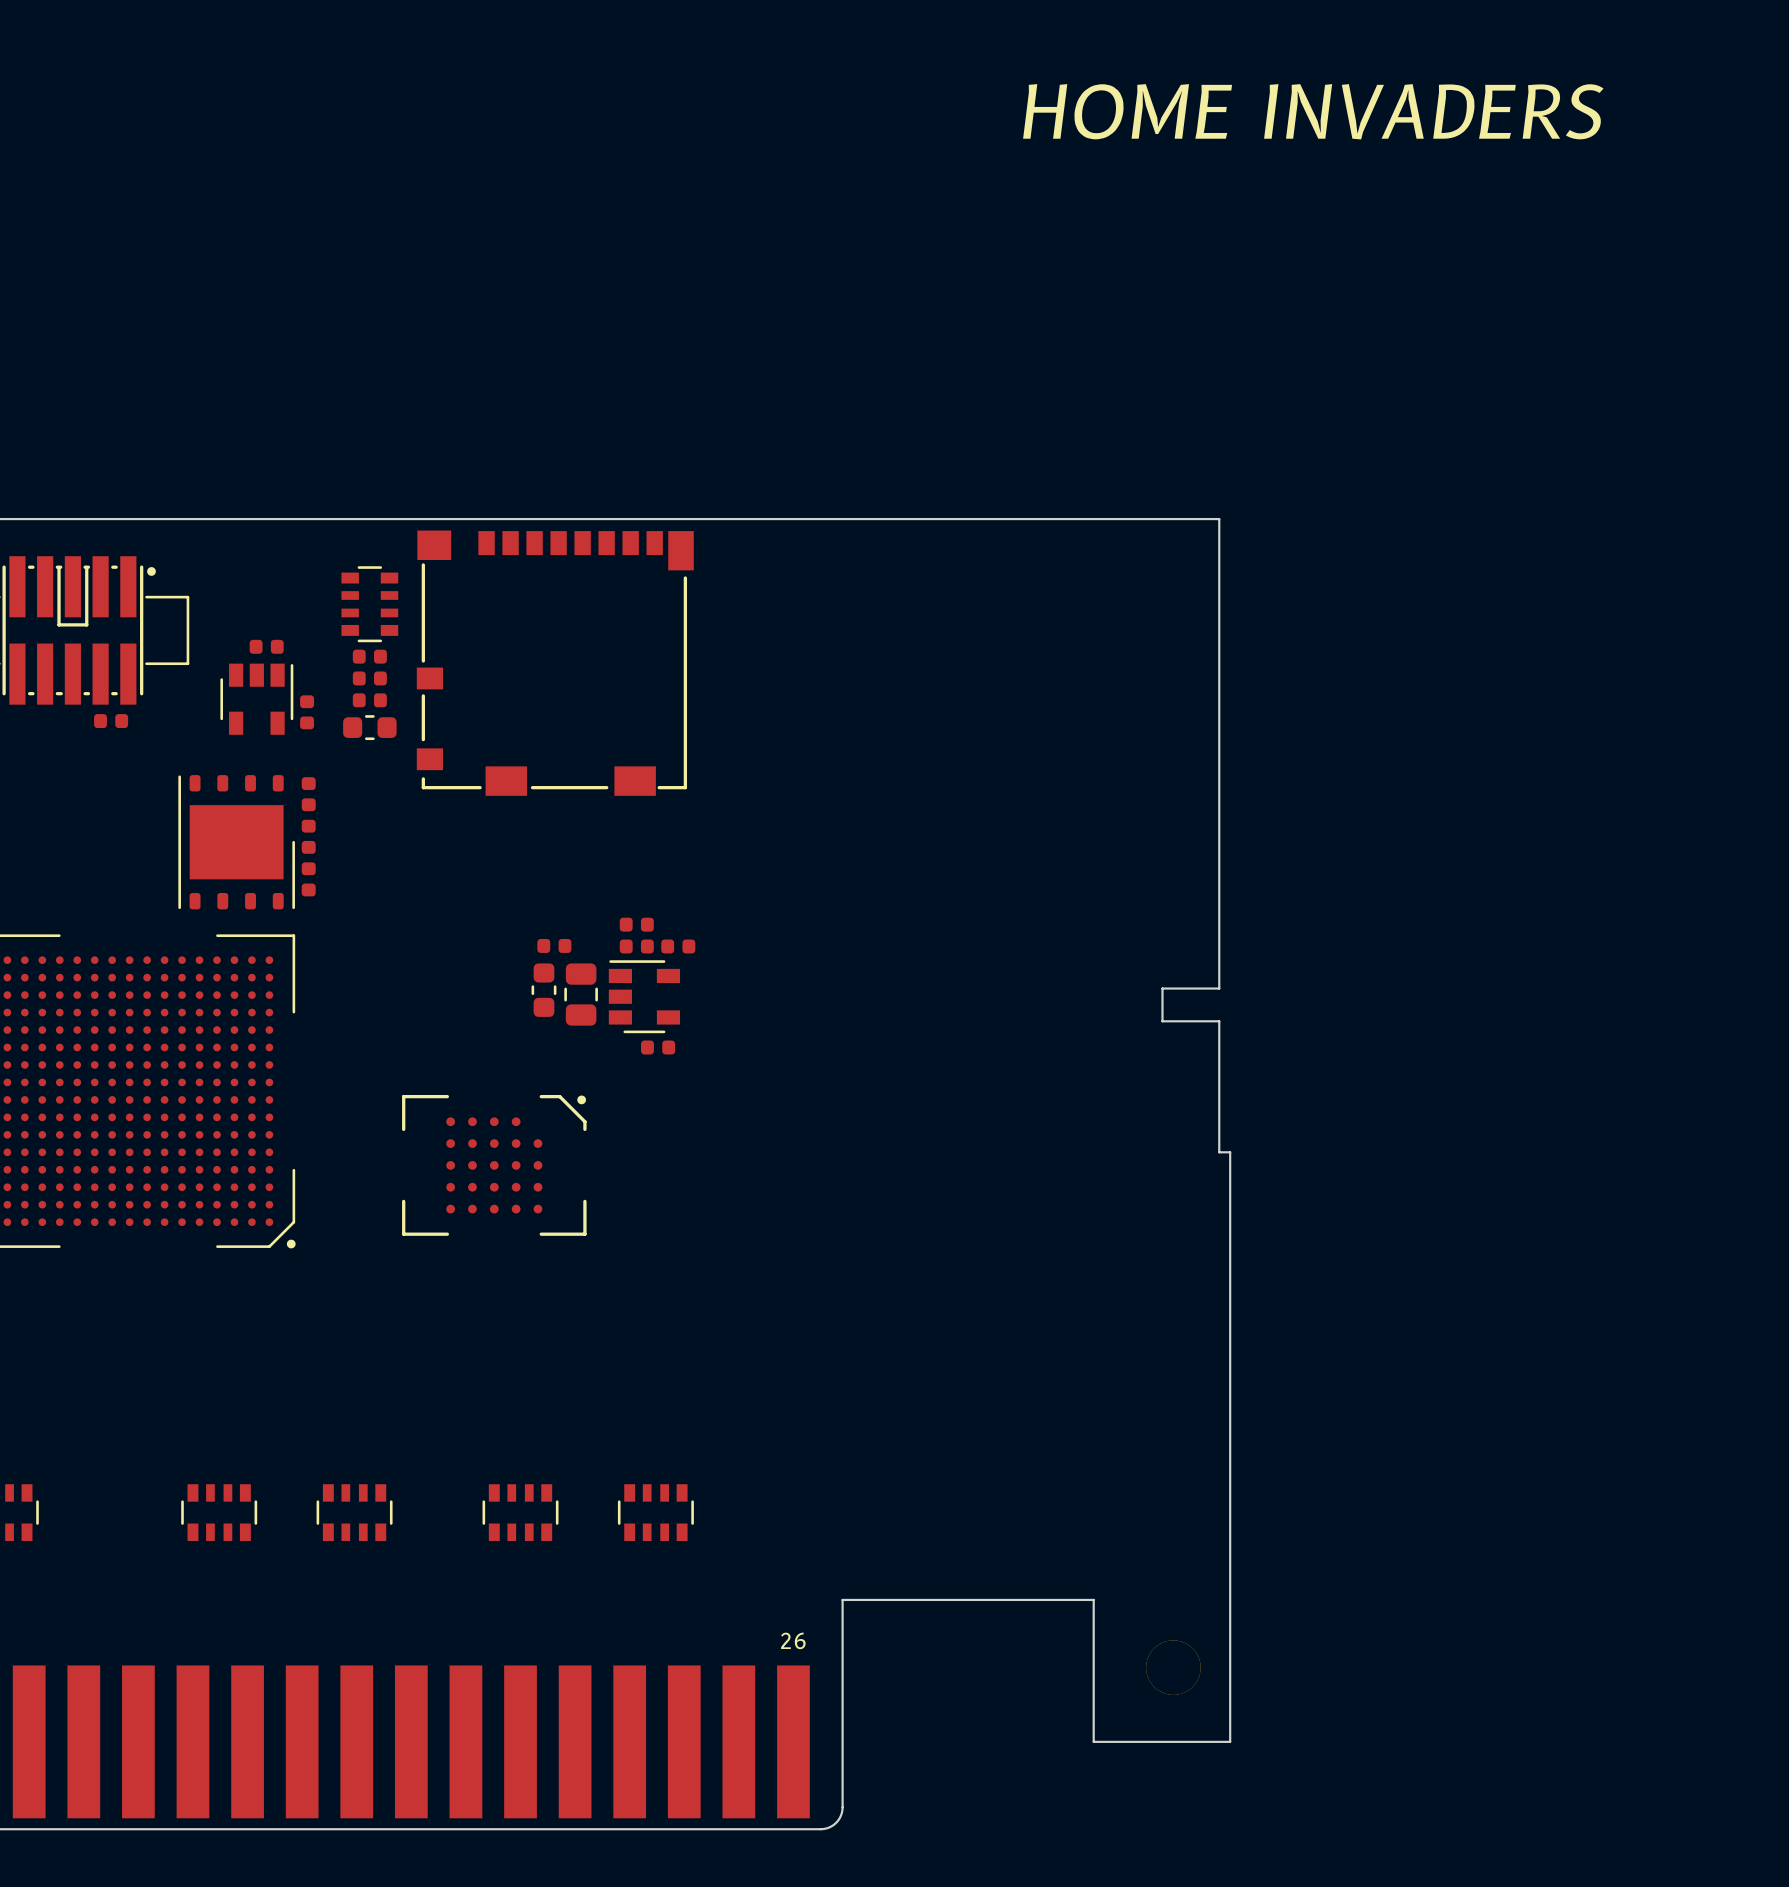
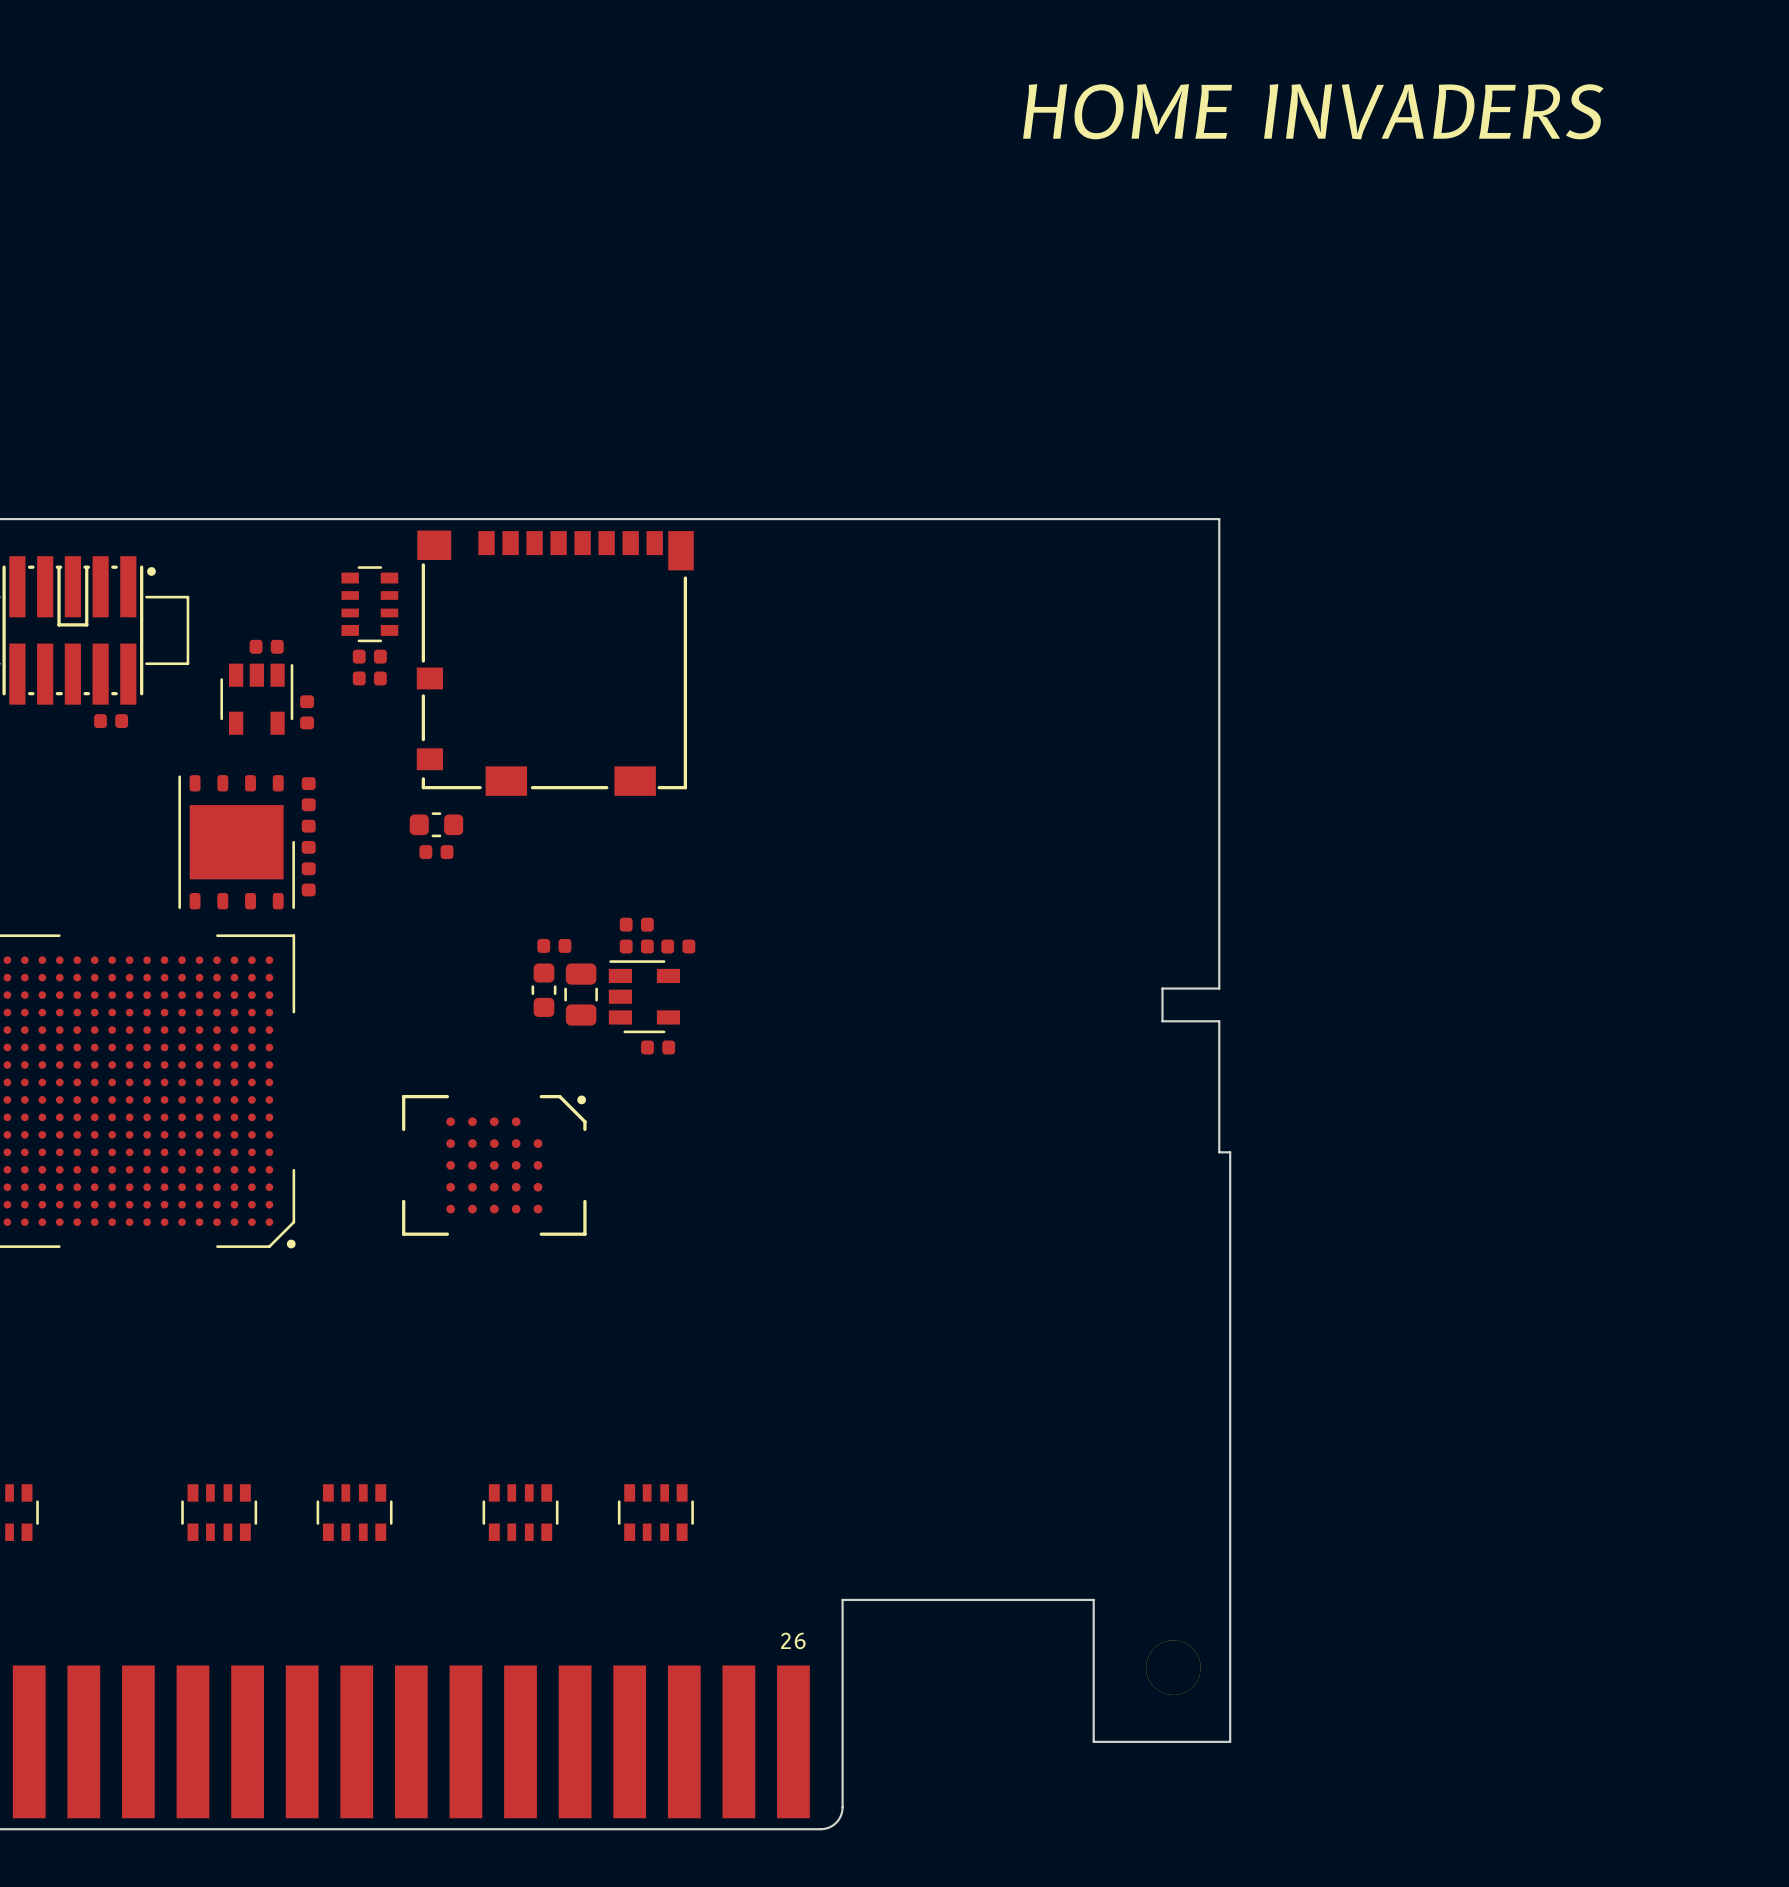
part position: (369, 700) -> (436, 852)
part position: (369, 727) -> (436, 824)

